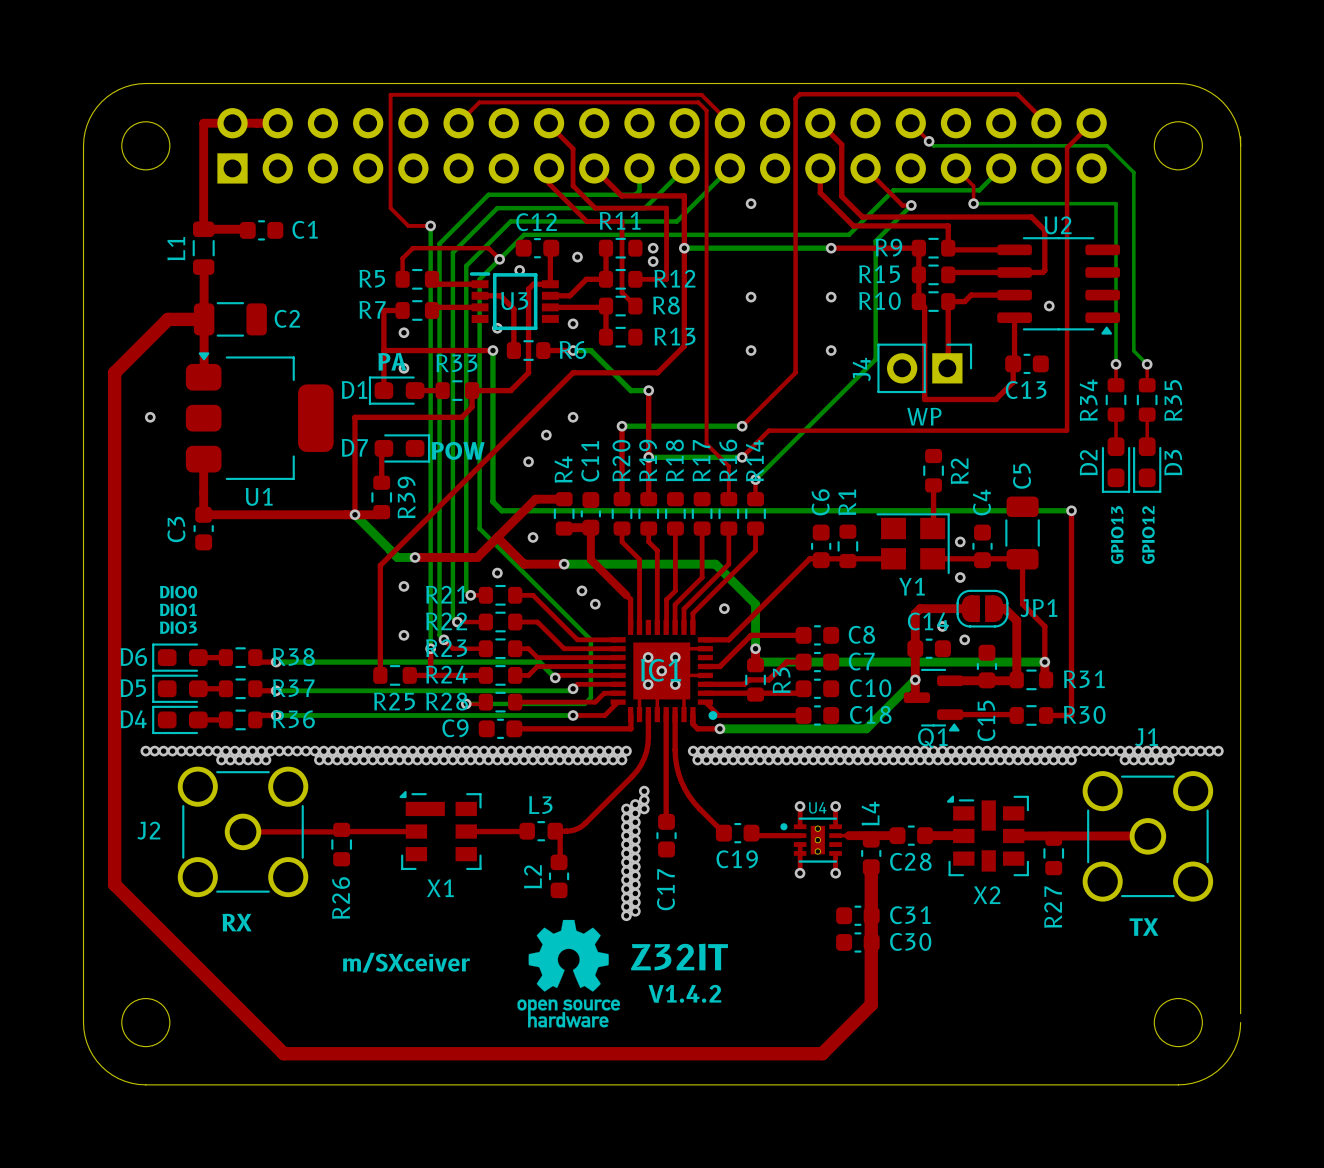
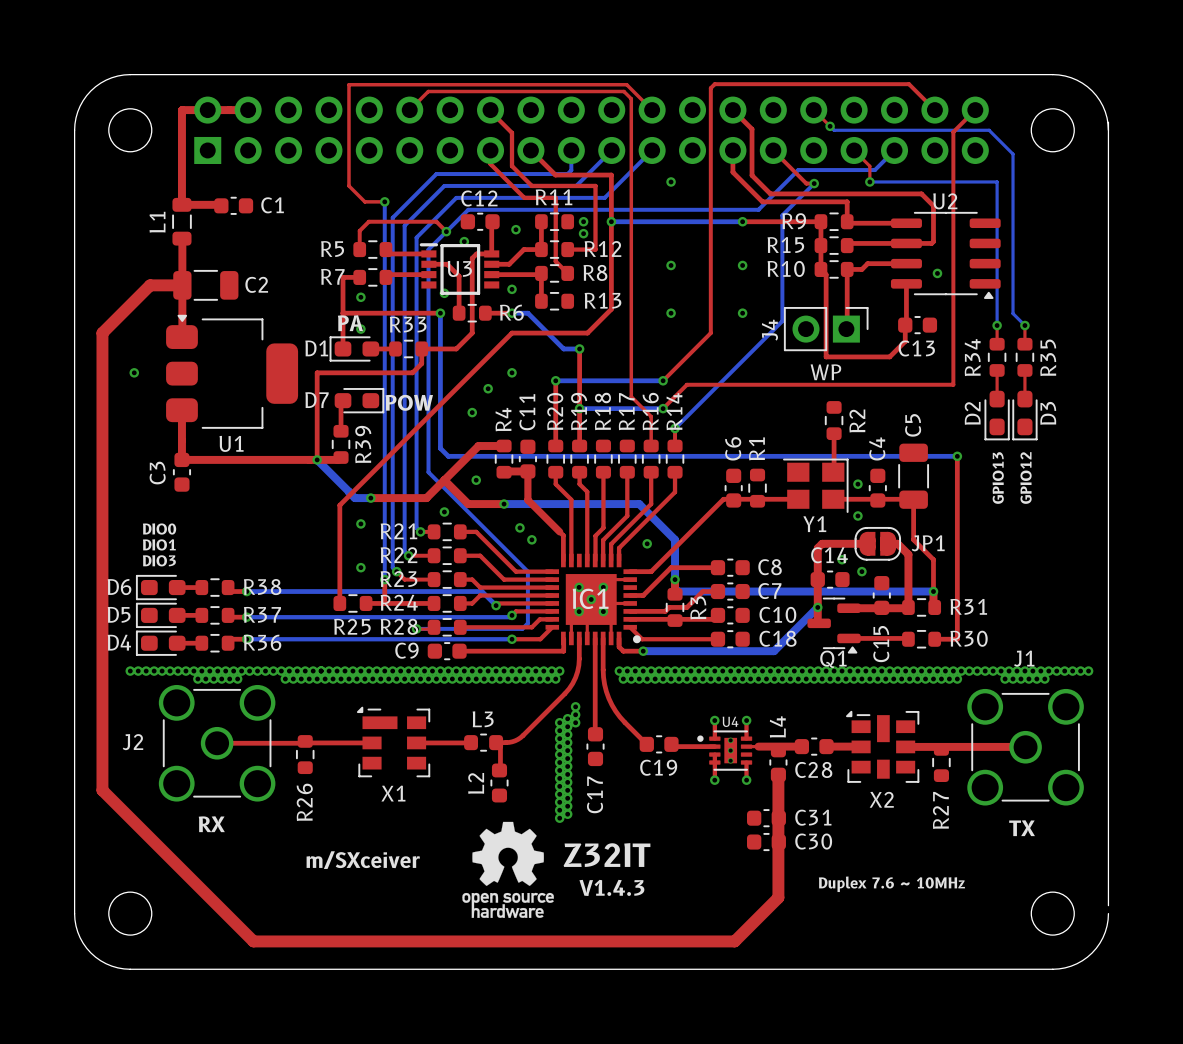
text: none -> Duplex 7.6 ~ 10MHz (891, 884)
text: V1.4.2 (684, 993) -> V1.4.3 (611, 887)

